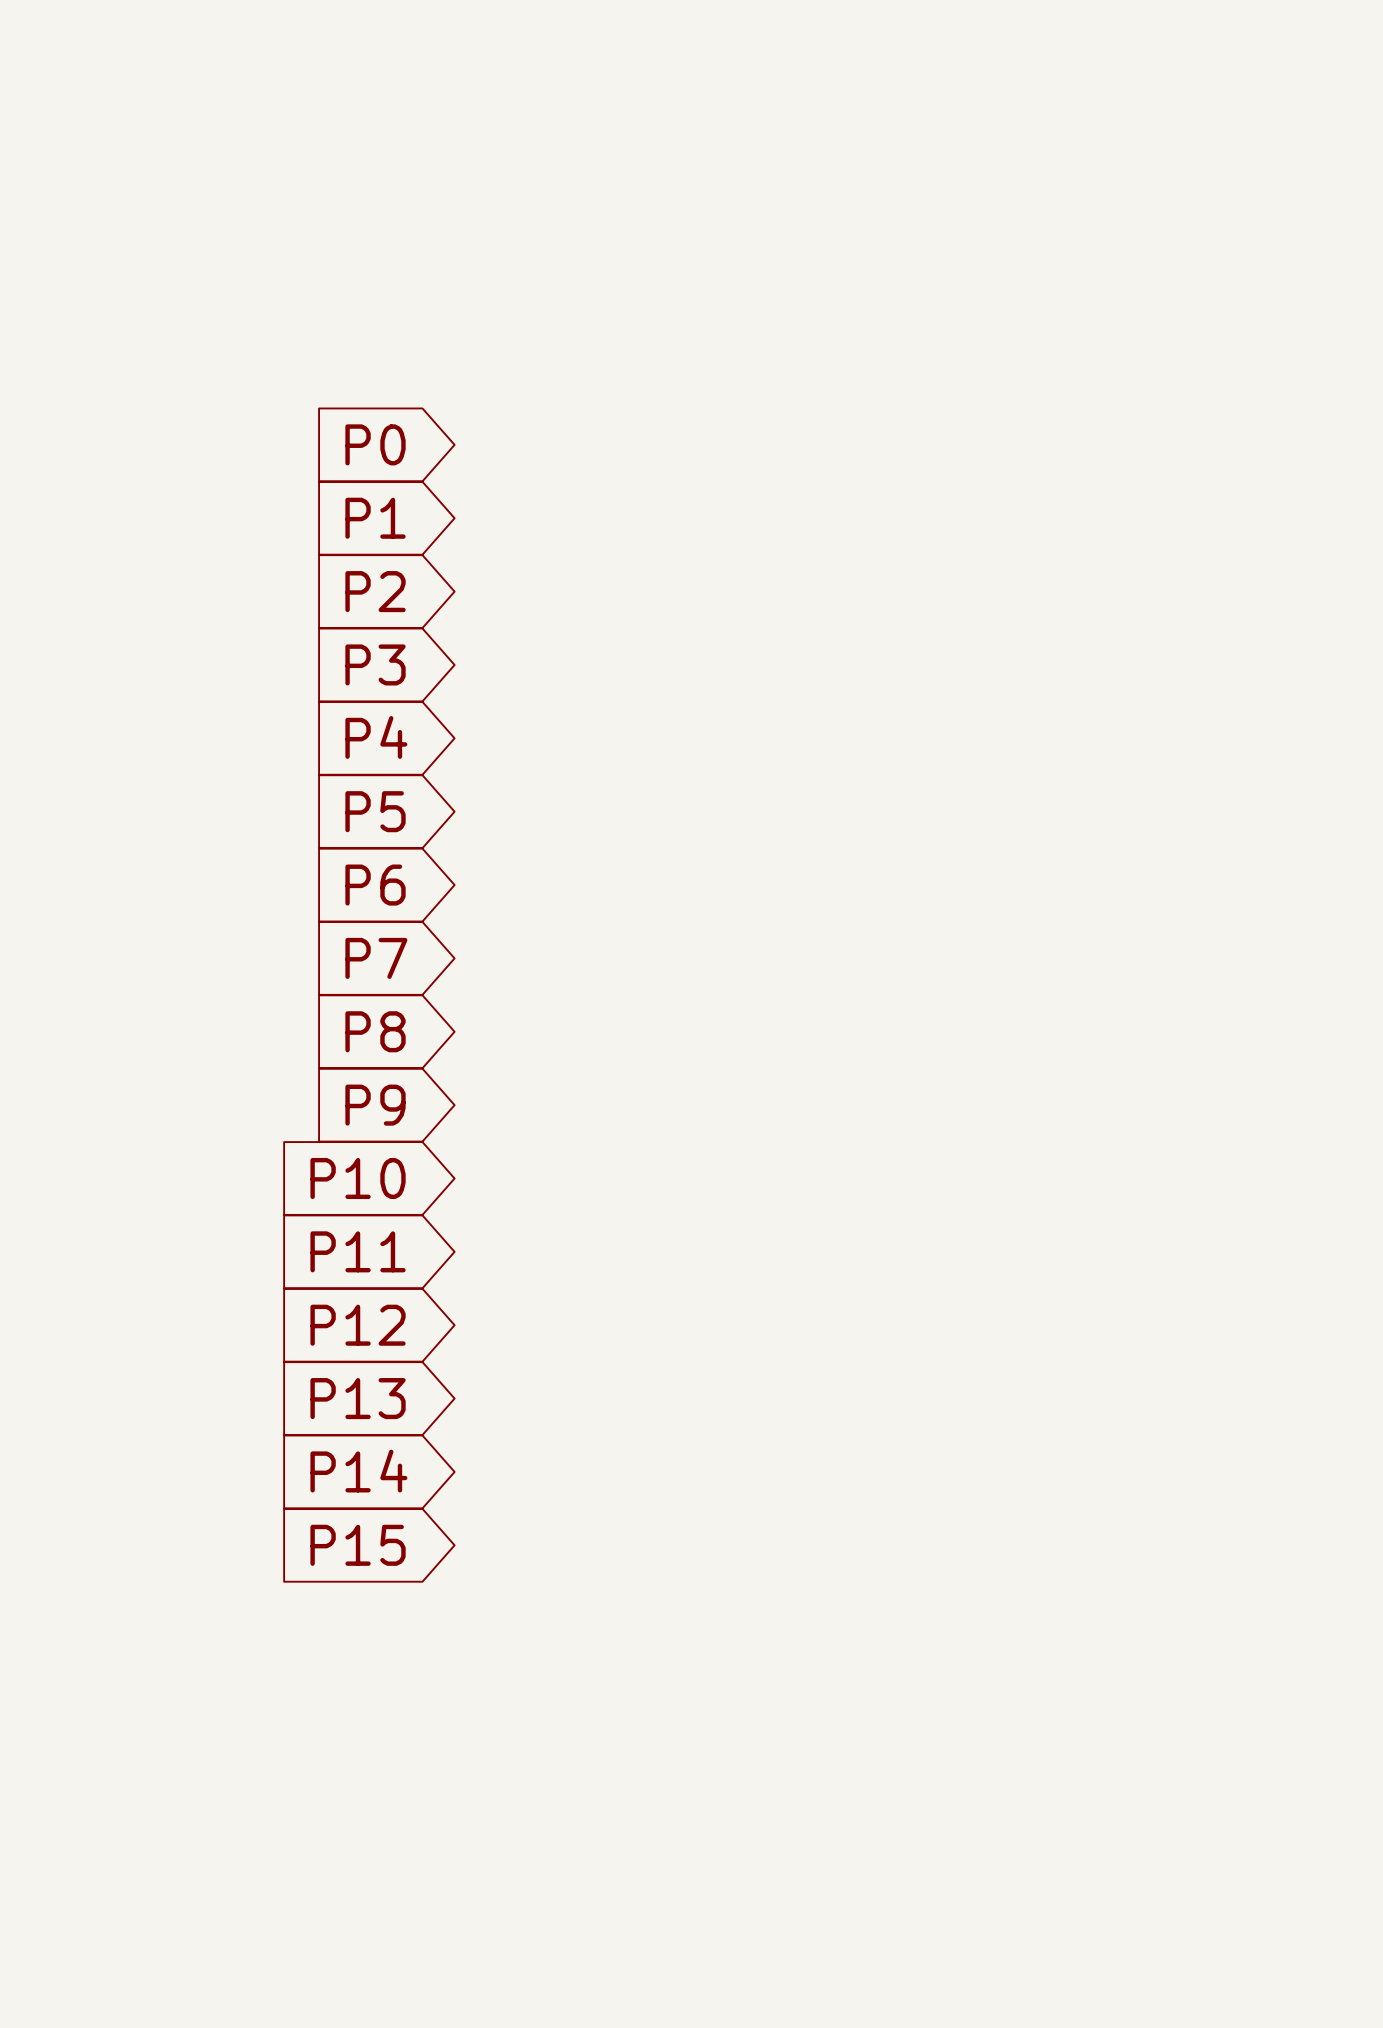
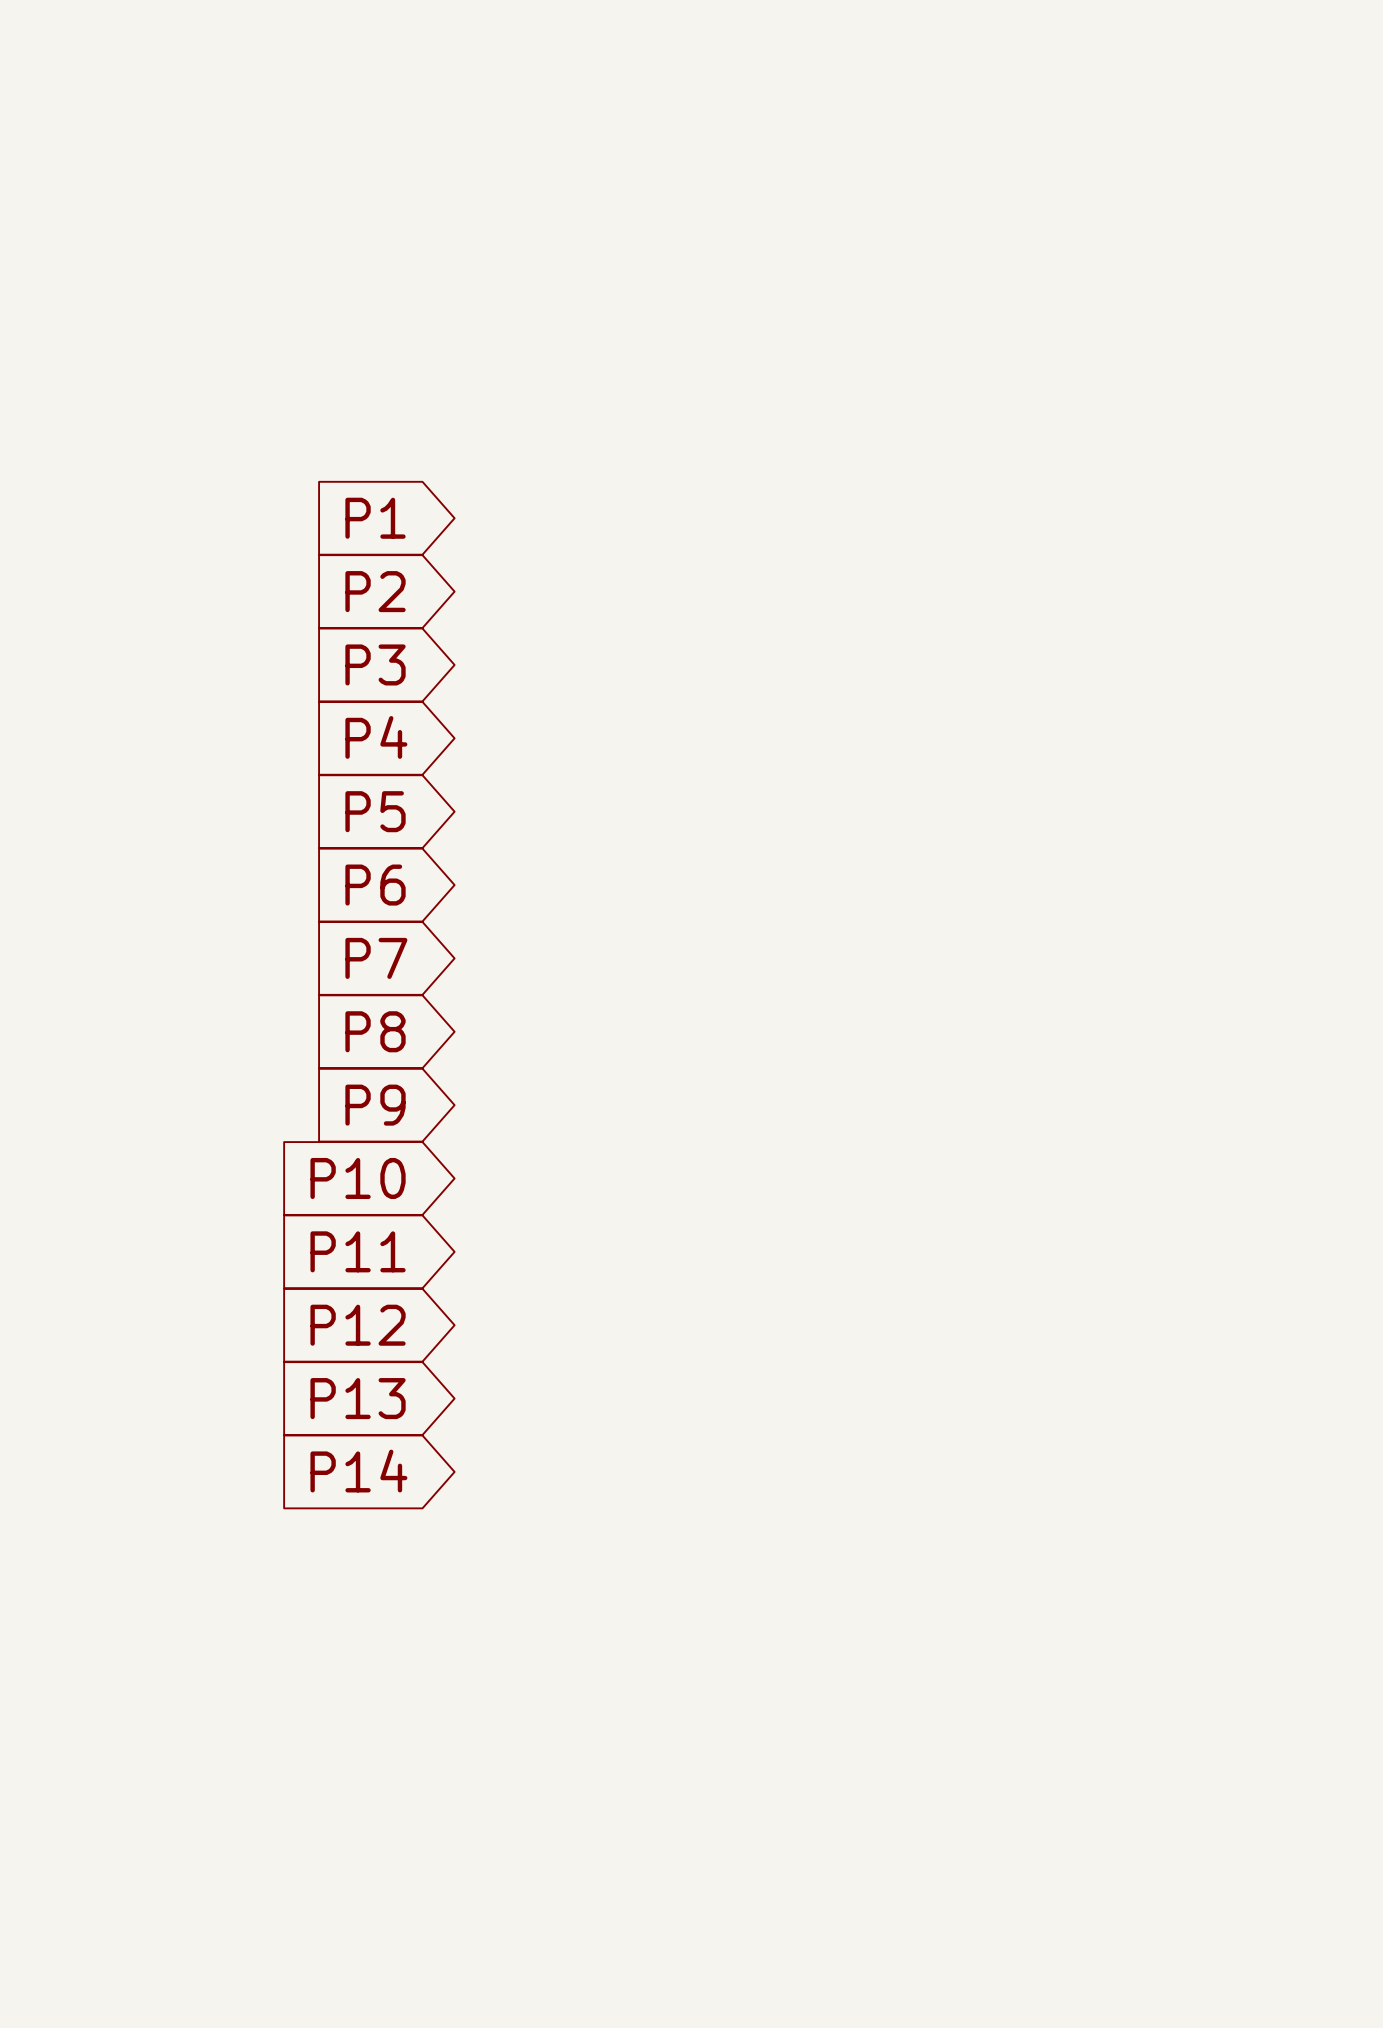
global label: P0 (375, 444) -> none
global label: P15 (358, 1545) -> none

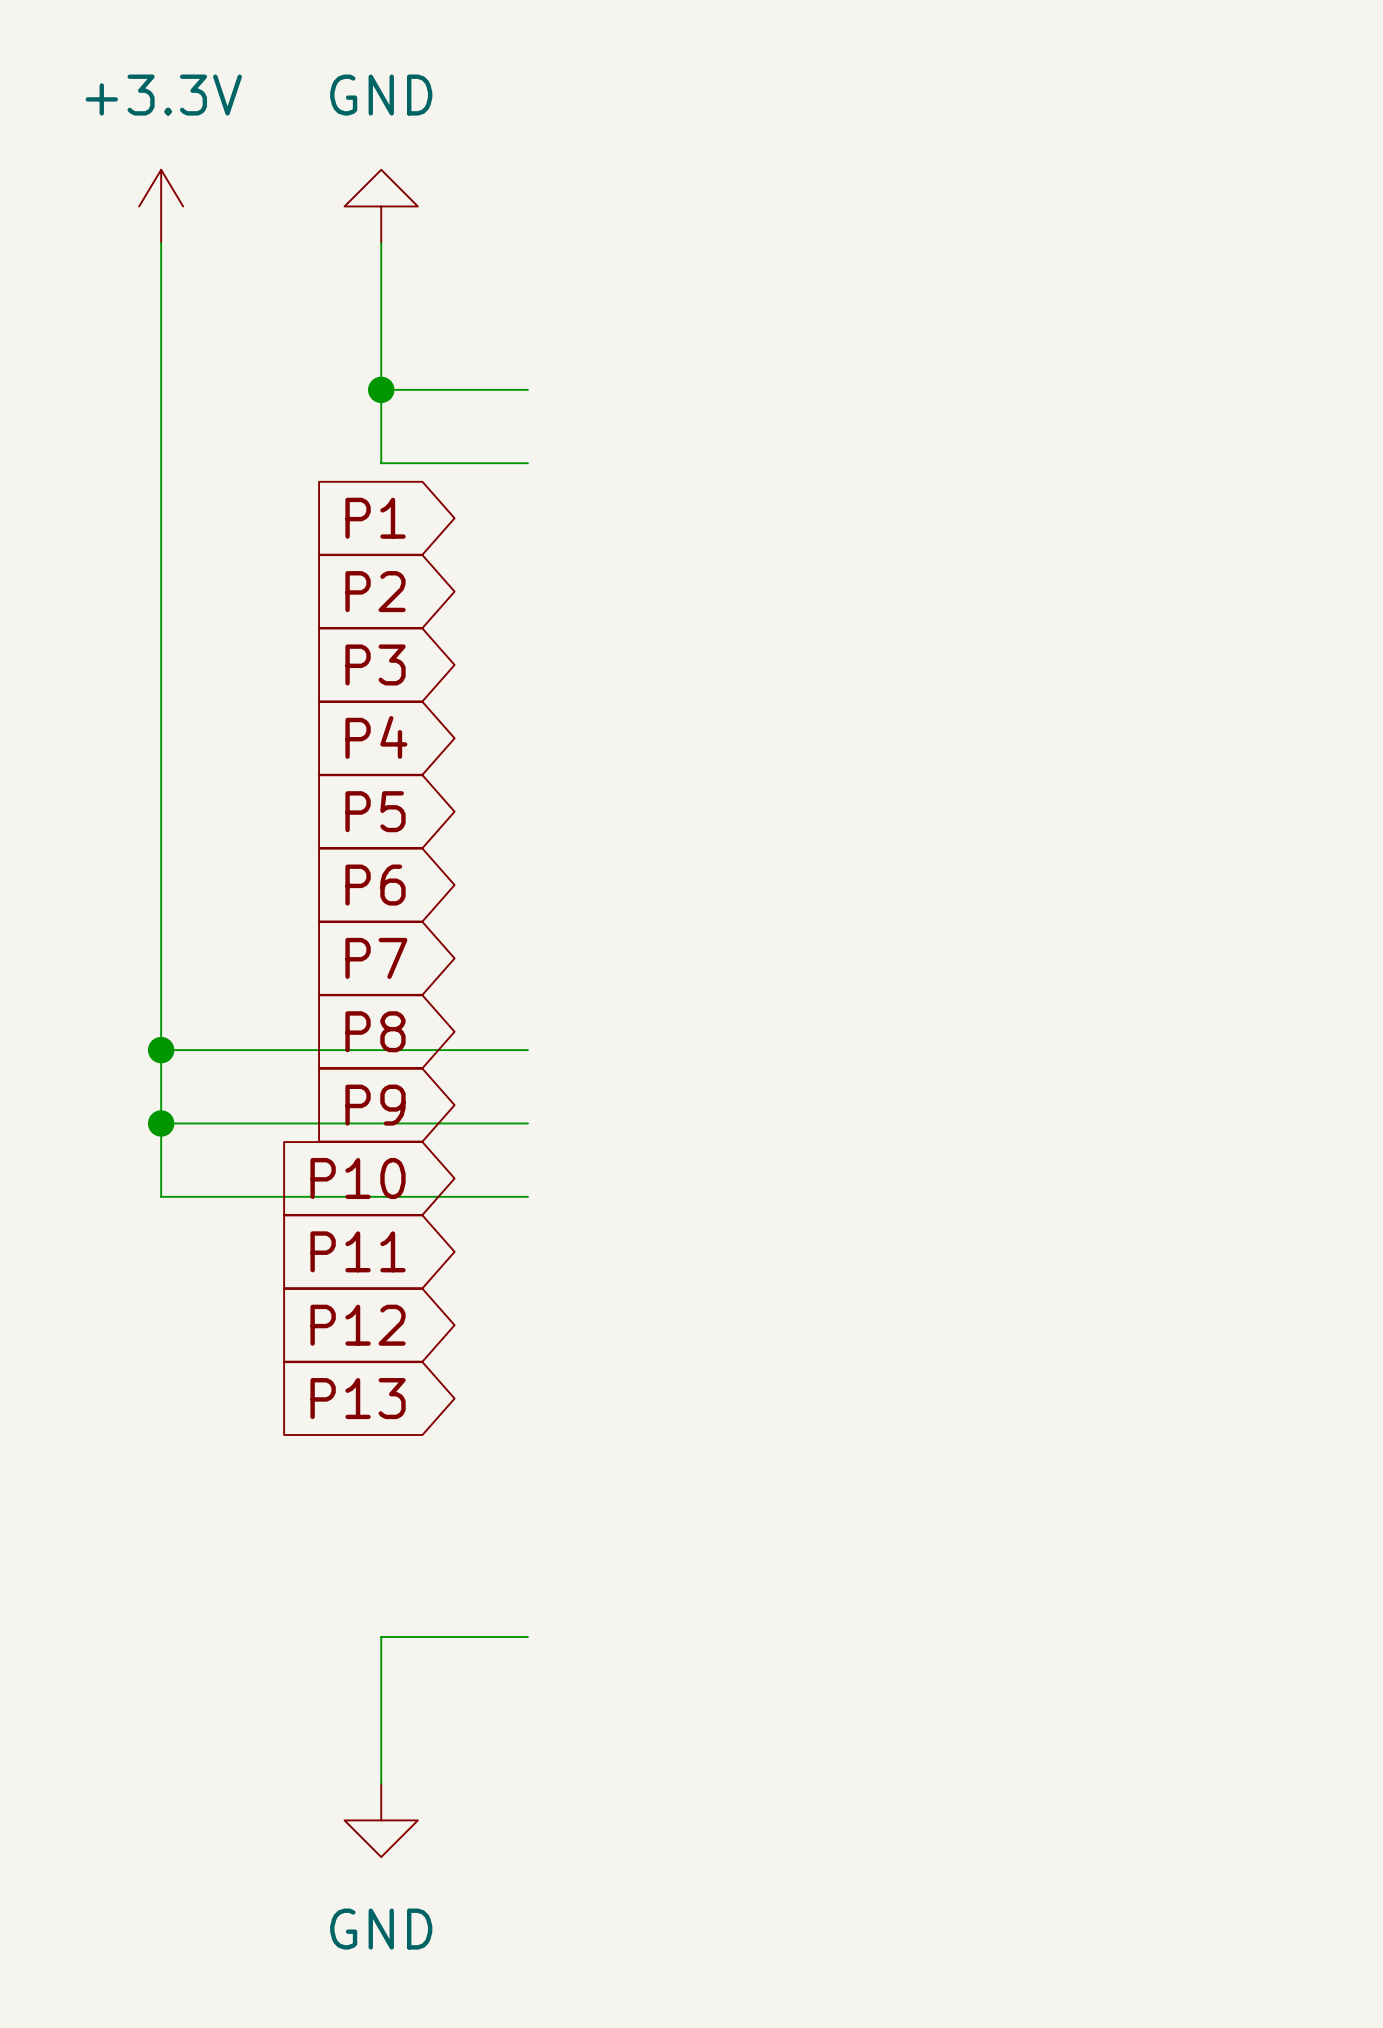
power symbol: none -> +3.3V (161, 206)
power symbol: none -> GND (381, 206)
wire: none -> (161, 243) (161, 1196) (527, 1196)
wire: none -> (381, 243) (381, 463) (527, 463)
wire: none -> (381, 389) (527, 389)
junction: none -> (381, 389)
wire: none -> (161, 1050) (527, 1050)
junction: none -> (161, 1050)
wire: none -> (161, 1123) (527, 1123)
junction: none -> (161, 1123)
global label: P14 (358, 1471) -> none
wire: none -> (527, 1636) (381, 1636) (381, 1783)
power symbol: none -> GND (381, 1820)

